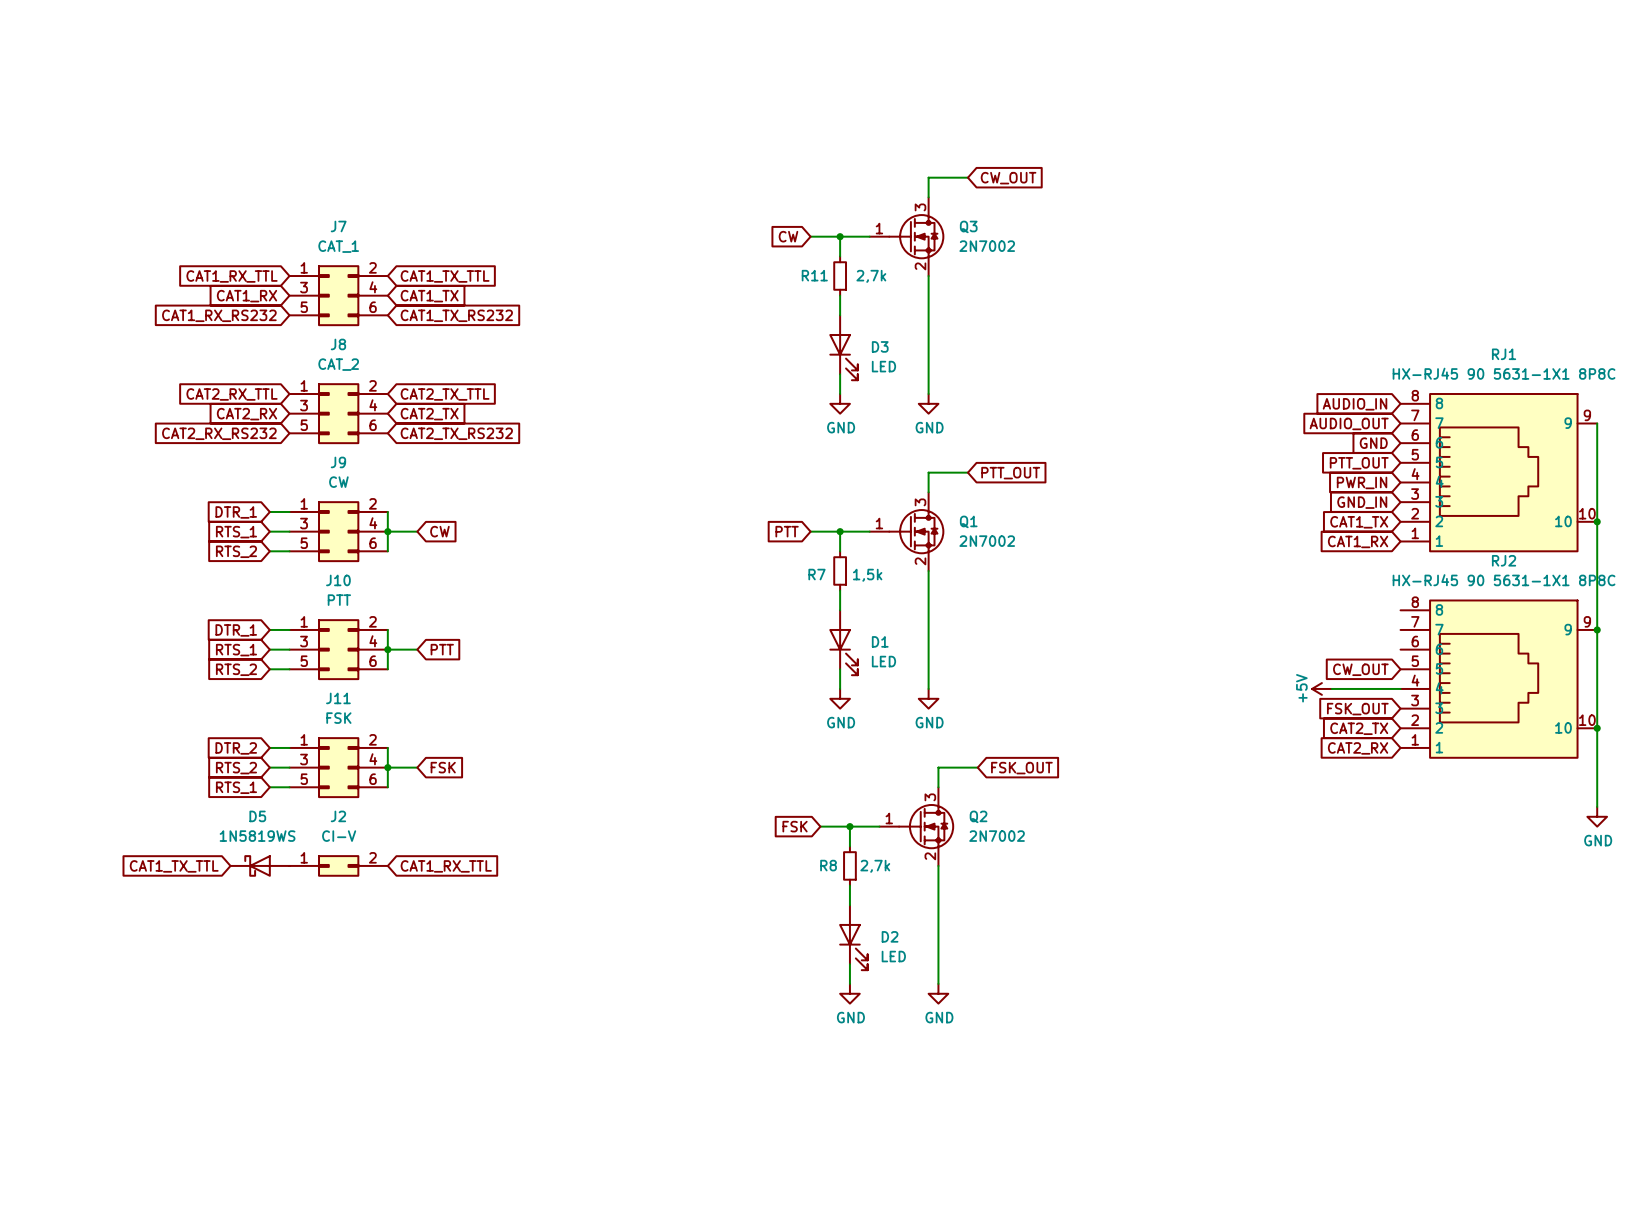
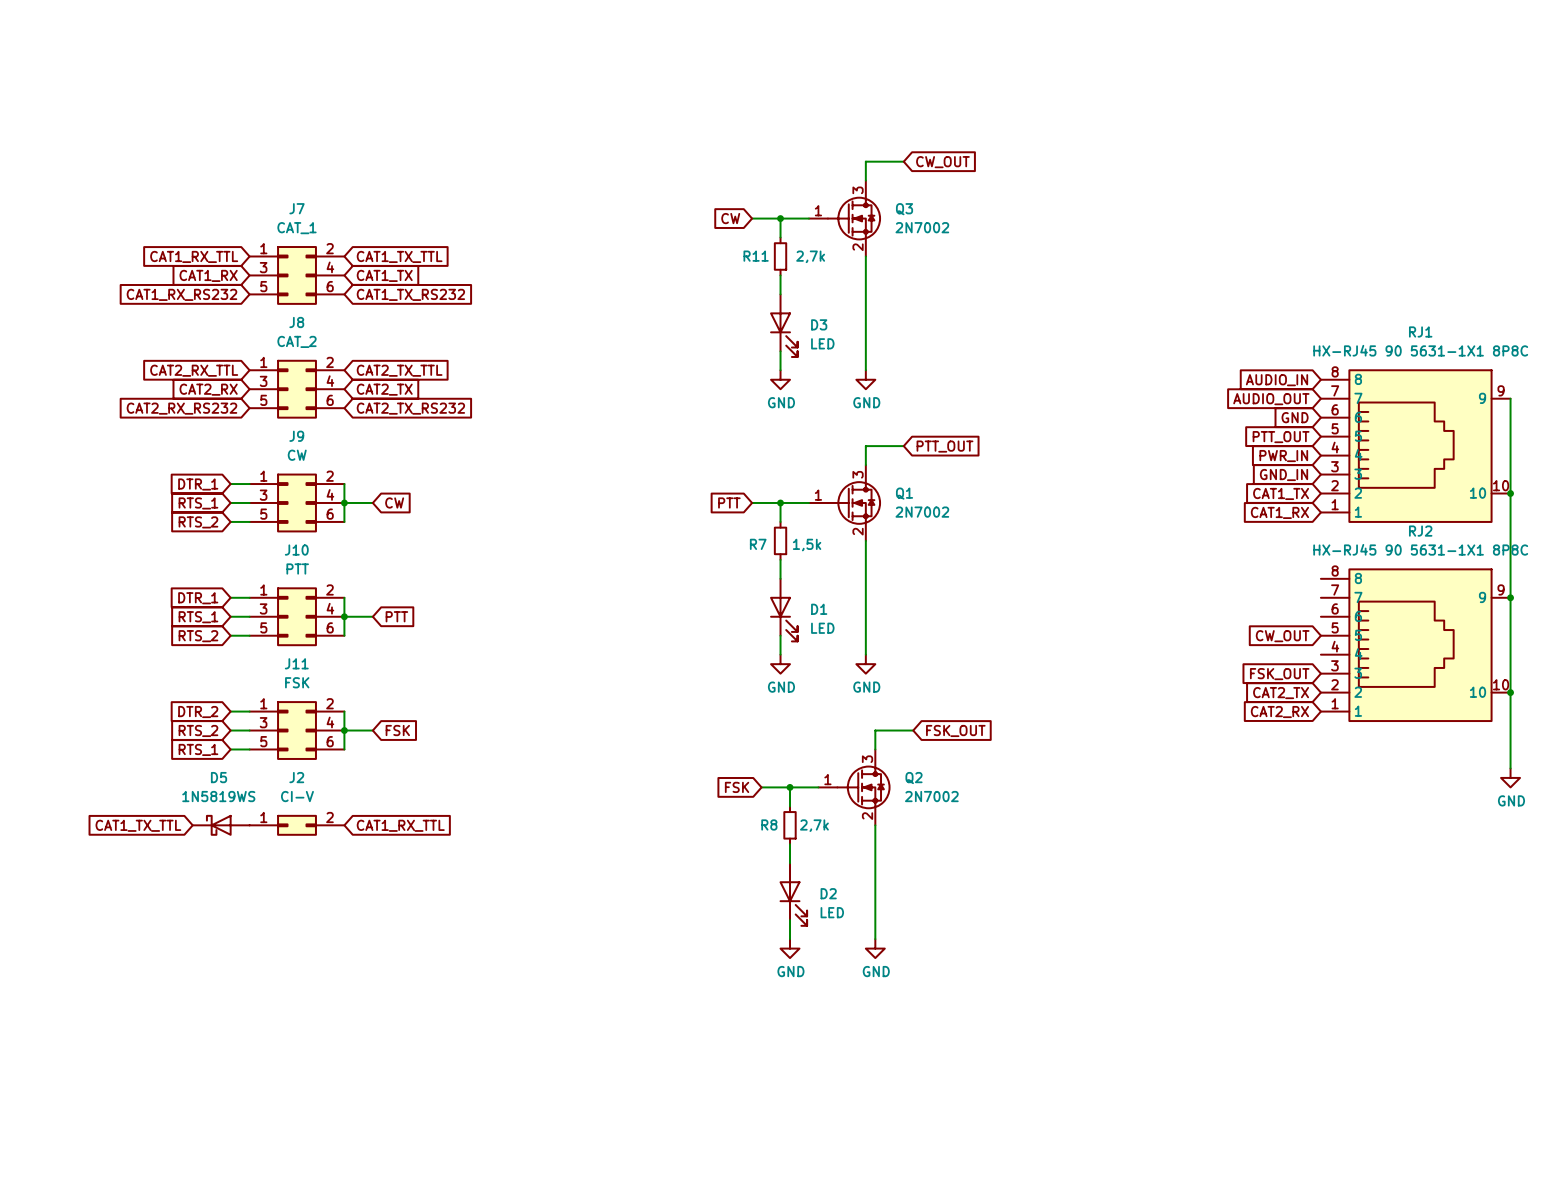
power symbol: +5V (1321, 688) -> none
wire: (1331, 688) (1400, 688) -> none

